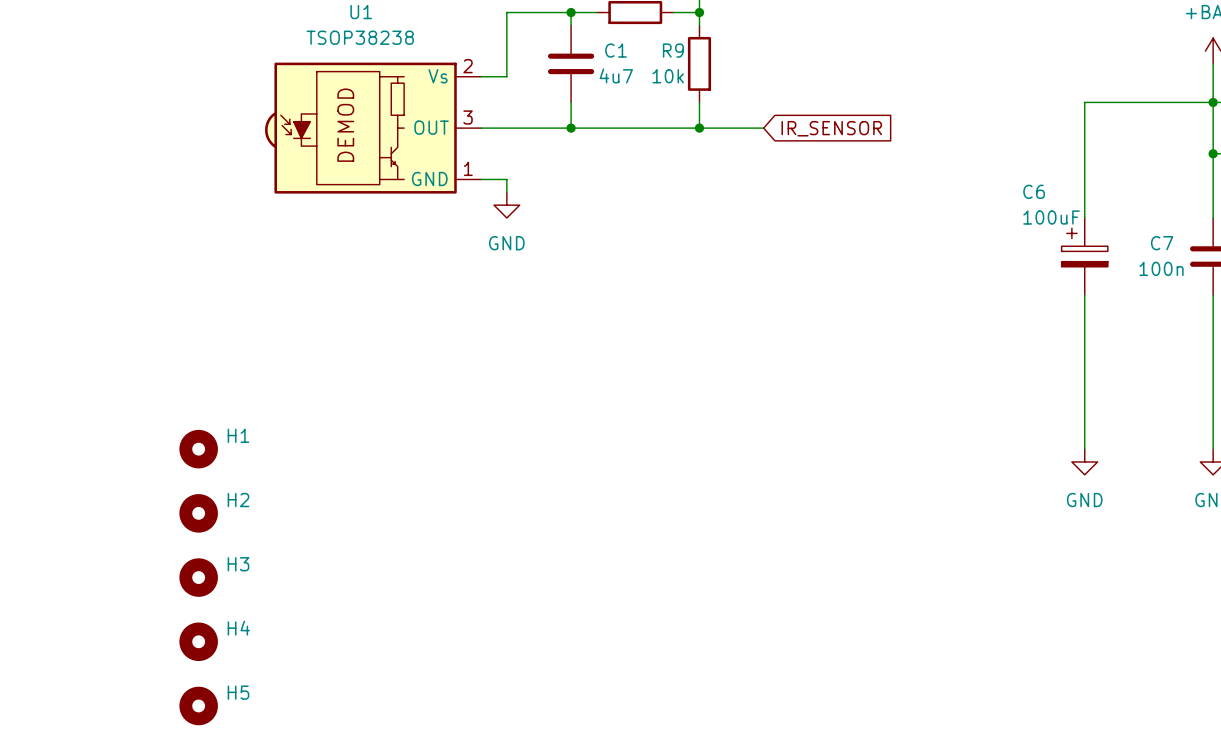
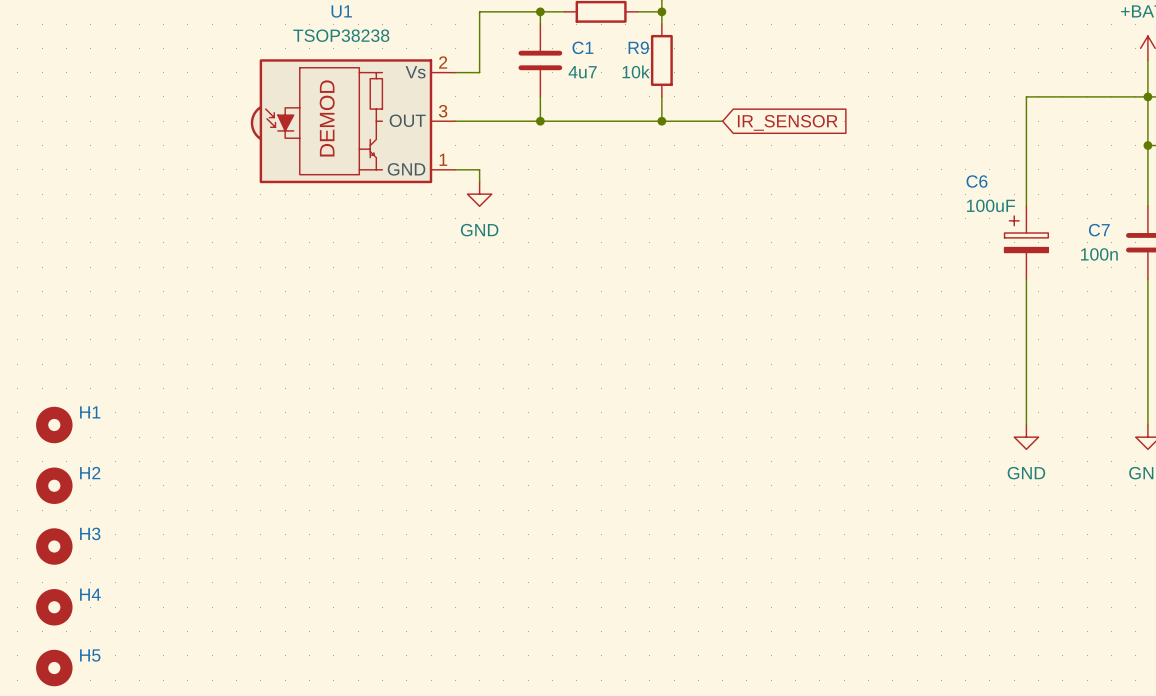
H1 position: (198, 449) -> (54, 425)
H2 position: (198, 513) -> (54, 485)
H3 position: (198, 577) -> (54, 546)
H4 position: (198, 641) -> (54, 607)
H5 position: (198, 705) -> (54, 668)

